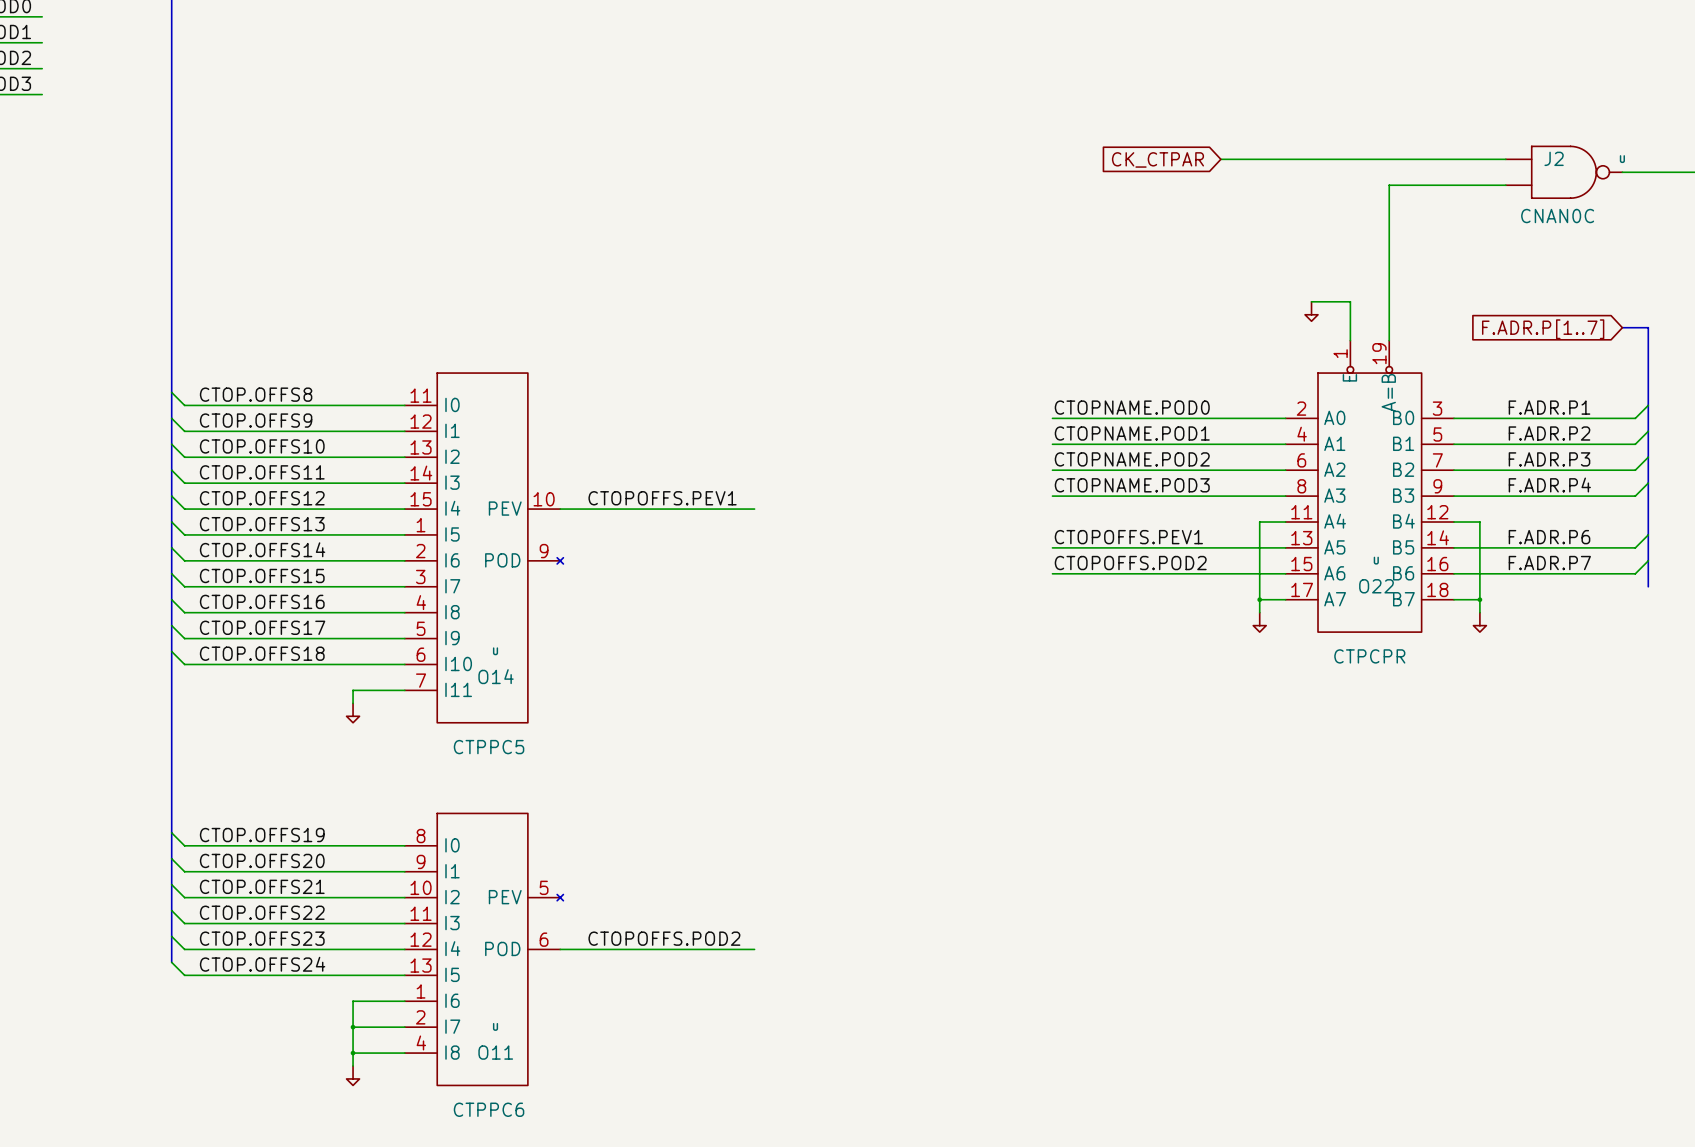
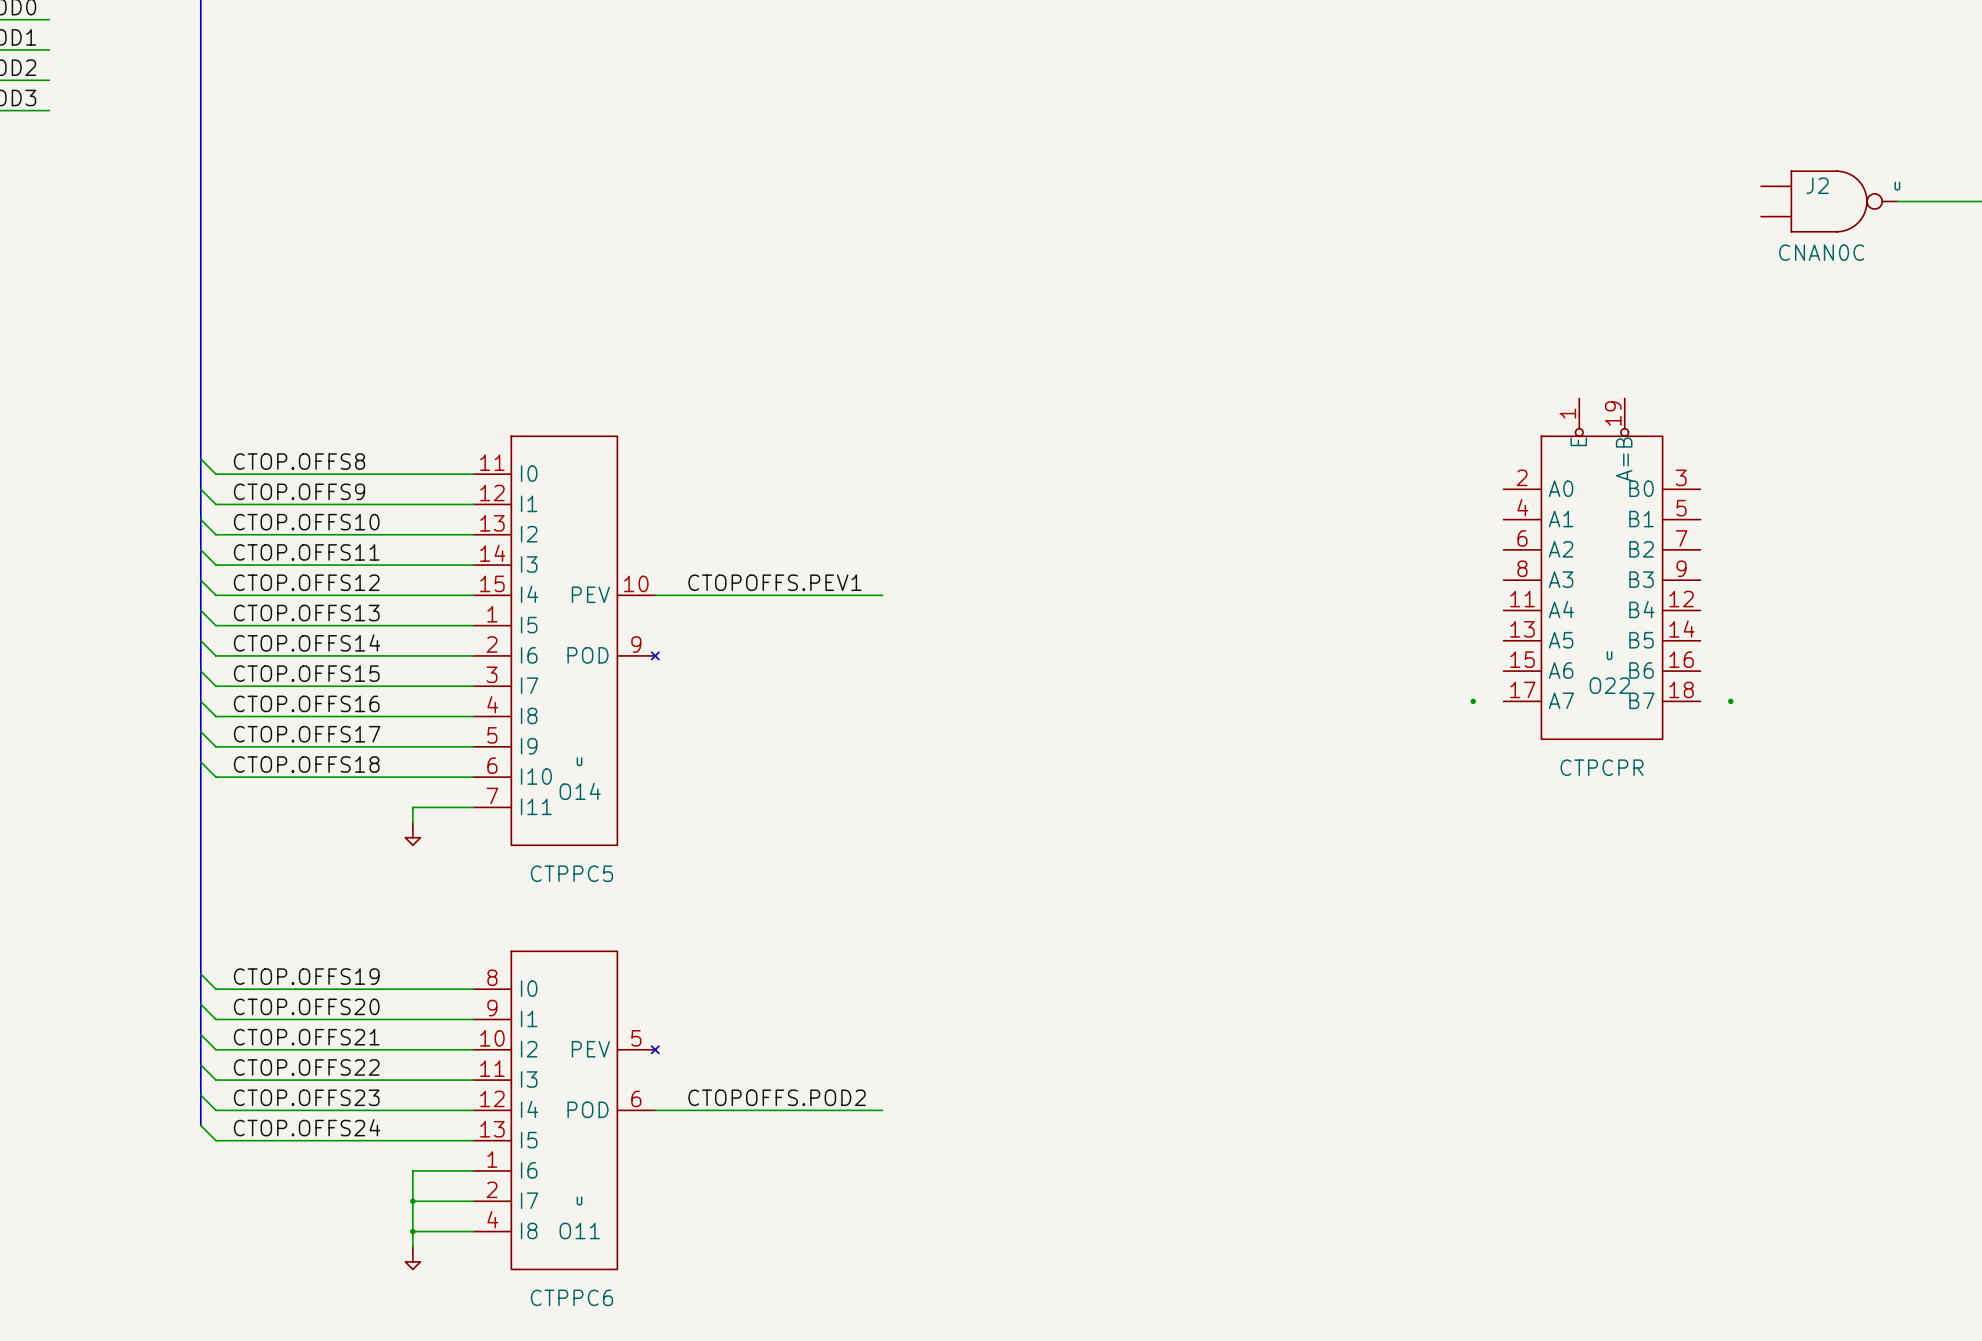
global label: CK_CTPAR (1157, 159) -> none
wire: (1220, 159) (1505, 159) -> none
wire: (1505, 185) (1389, 185) (1389, 340) -> none
wire: (1311, 301) (1350, 301) (1350, 340) -> none
power symbol: (1311, 311) -> none
bus: (1622, 327) (1648, 327) (1648, 586) -> none
global label: F.ADR.P[1..7] (1543, 329) -> none
wire: (1648, 405) (1635, 418) (1454, 418) -> none
label: CTOPNAME.POD0 (1132, 407) -> none
label: F.ADR.P1 (1549, 407) -> none
wire: (1052, 418) (1285, 418) -> none
wire: (1648, 431) (1635, 444) (1454, 444) -> none
label: CTOPNAME.POD1 (1132, 433) -> none
label: F.ADR.P2 (1549, 433) -> none
wire: (1052, 444) (1285, 444) -> none
wire: (1648, 457) (1635, 470) (1454, 470) -> none
label: CTOPNAME.POD2 (1132, 459) -> none
label: F.ADR.P3 (1549, 459) -> none
wire: (1052, 470) (1285, 470) -> none
wire: (1648, 483) (1635, 496) (1454, 496) -> none
label: CTOPNAME.POD3 (1132, 485) -> none
label: F.ADR.P4 (1549, 485) -> none
wire: (1052, 496) (1285, 496) -> none
wire: (1285, 522) (1259, 522) (1259, 612) -> none
wire: (1454, 522) (1479, 522) (1479, 612) -> none
wire: (1648, 534) (1635, 547) (1454, 547) -> none
label: CTOPOFFS.PEV1 (1128, 537) -> none
label: F.ADR.P6 (1549, 537) -> none
wire: (1052, 547) (1285, 547) -> none
wire: (1648, 560) (1635, 573) (1454, 573) -> none
label: CTOPOFFS.POD2 (1130, 563) -> none
label: F.ADR.P7 (1549, 563) -> none
wire: (1052, 573) (1285, 573) -> none
wire: (1259, 599) (1285, 599) -> none
wire: (1454, 599) (1479, 599) -> none
power symbol: (1259, 622) -> none
power symbol: (1479, 622) -> none

